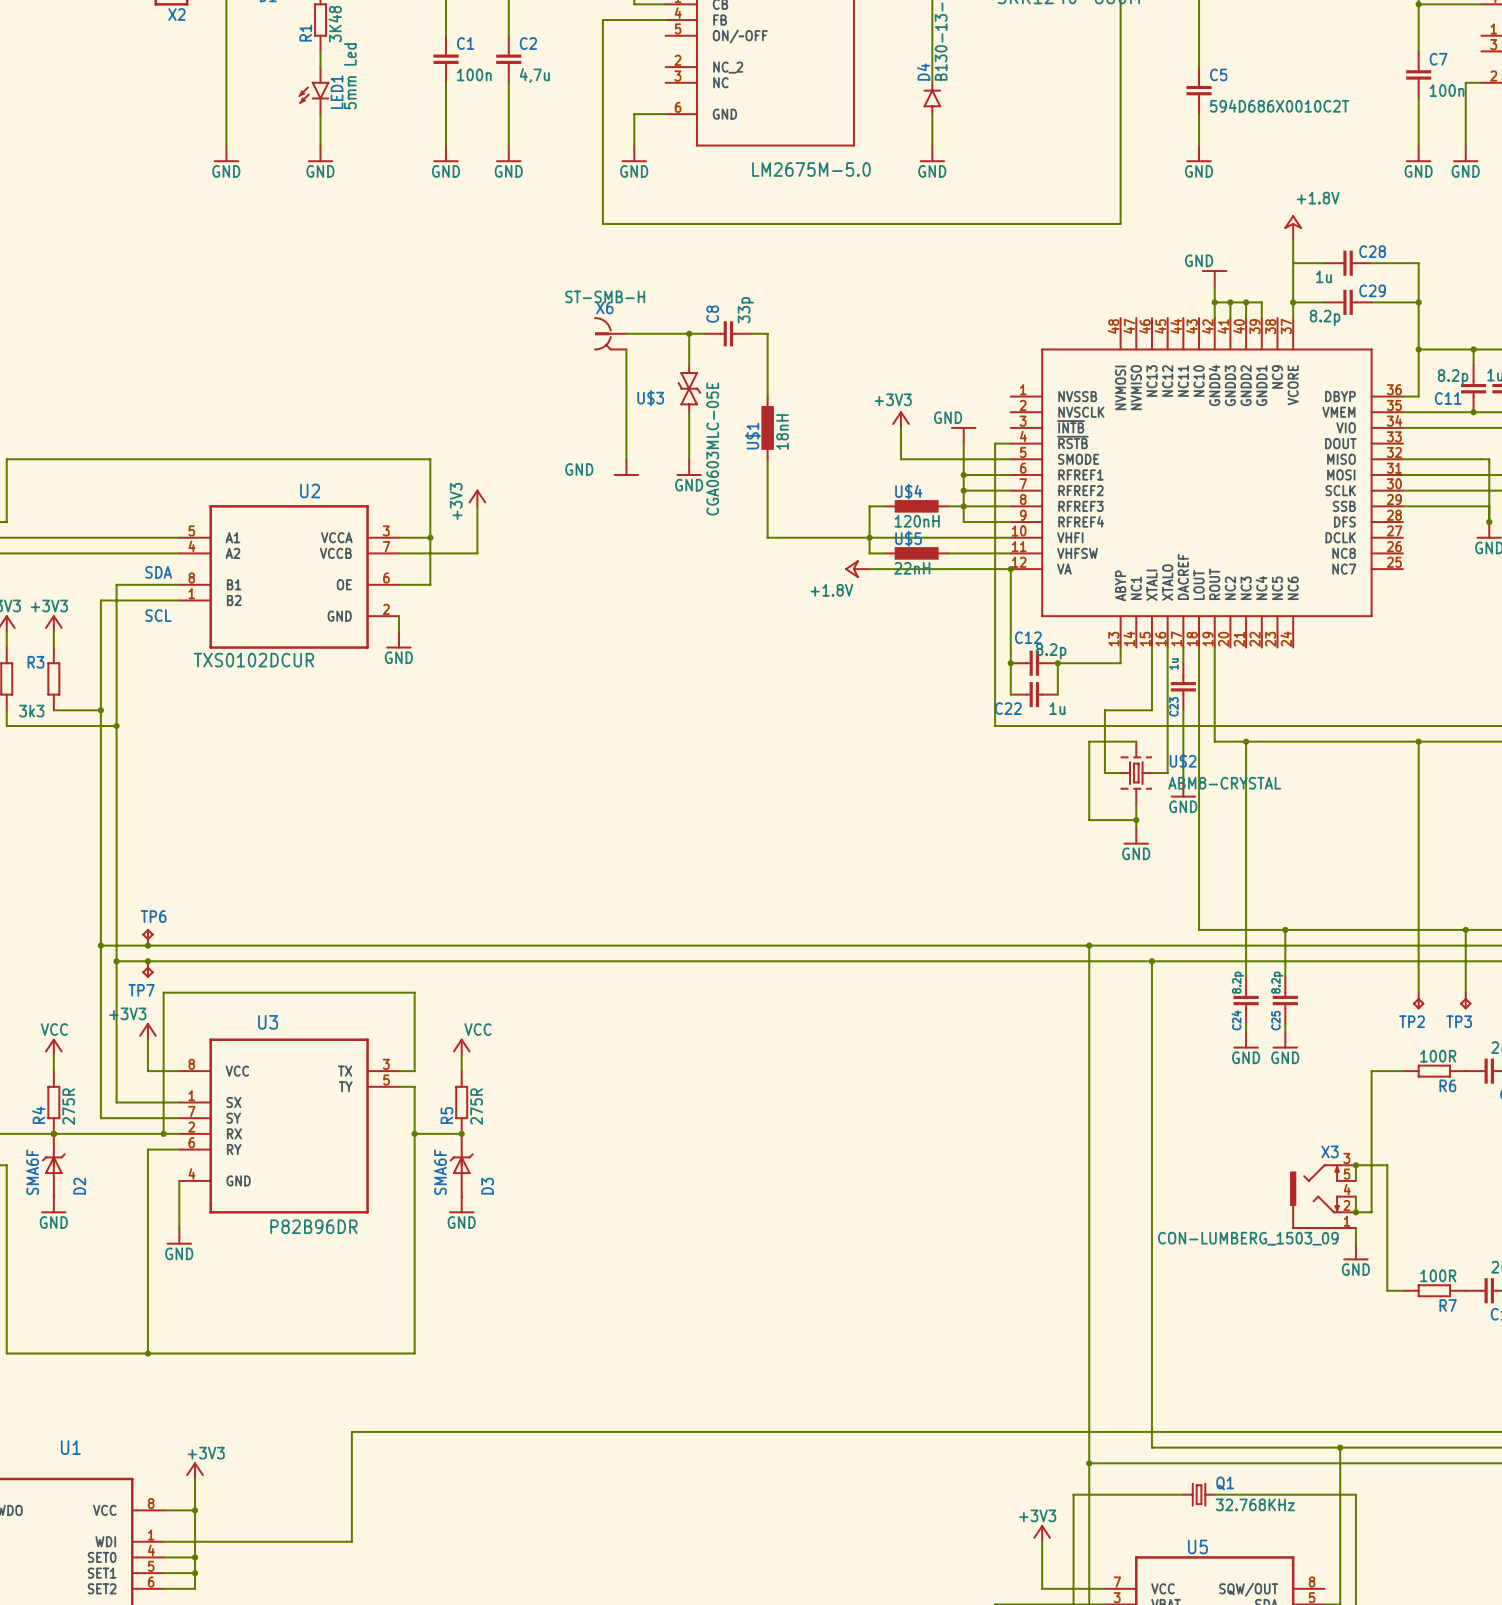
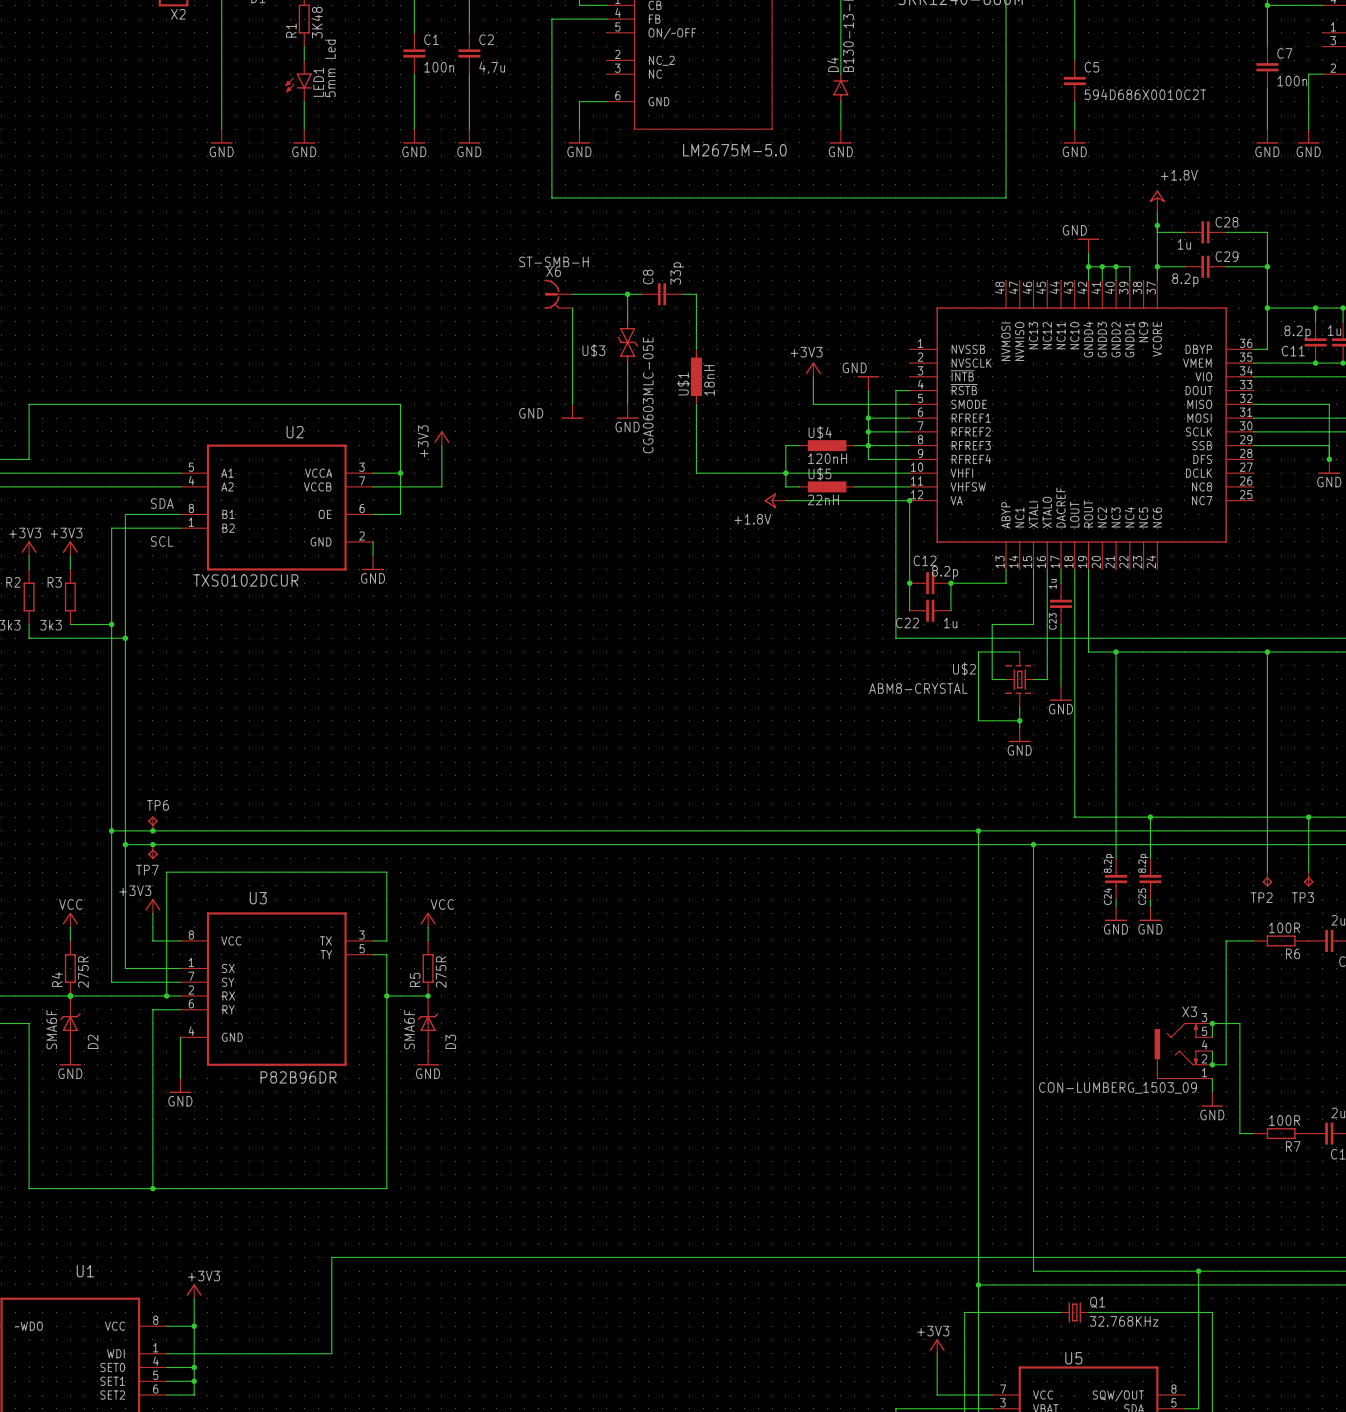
junction: none -> (1157, 225)
U$2 name position: U$2 (1183, 761) -> U$2 (964, 669)
U$2 value position: ABM8-CRYSTAL (1224, 783) -> ABM8-CRYSTAL (918, 688)

